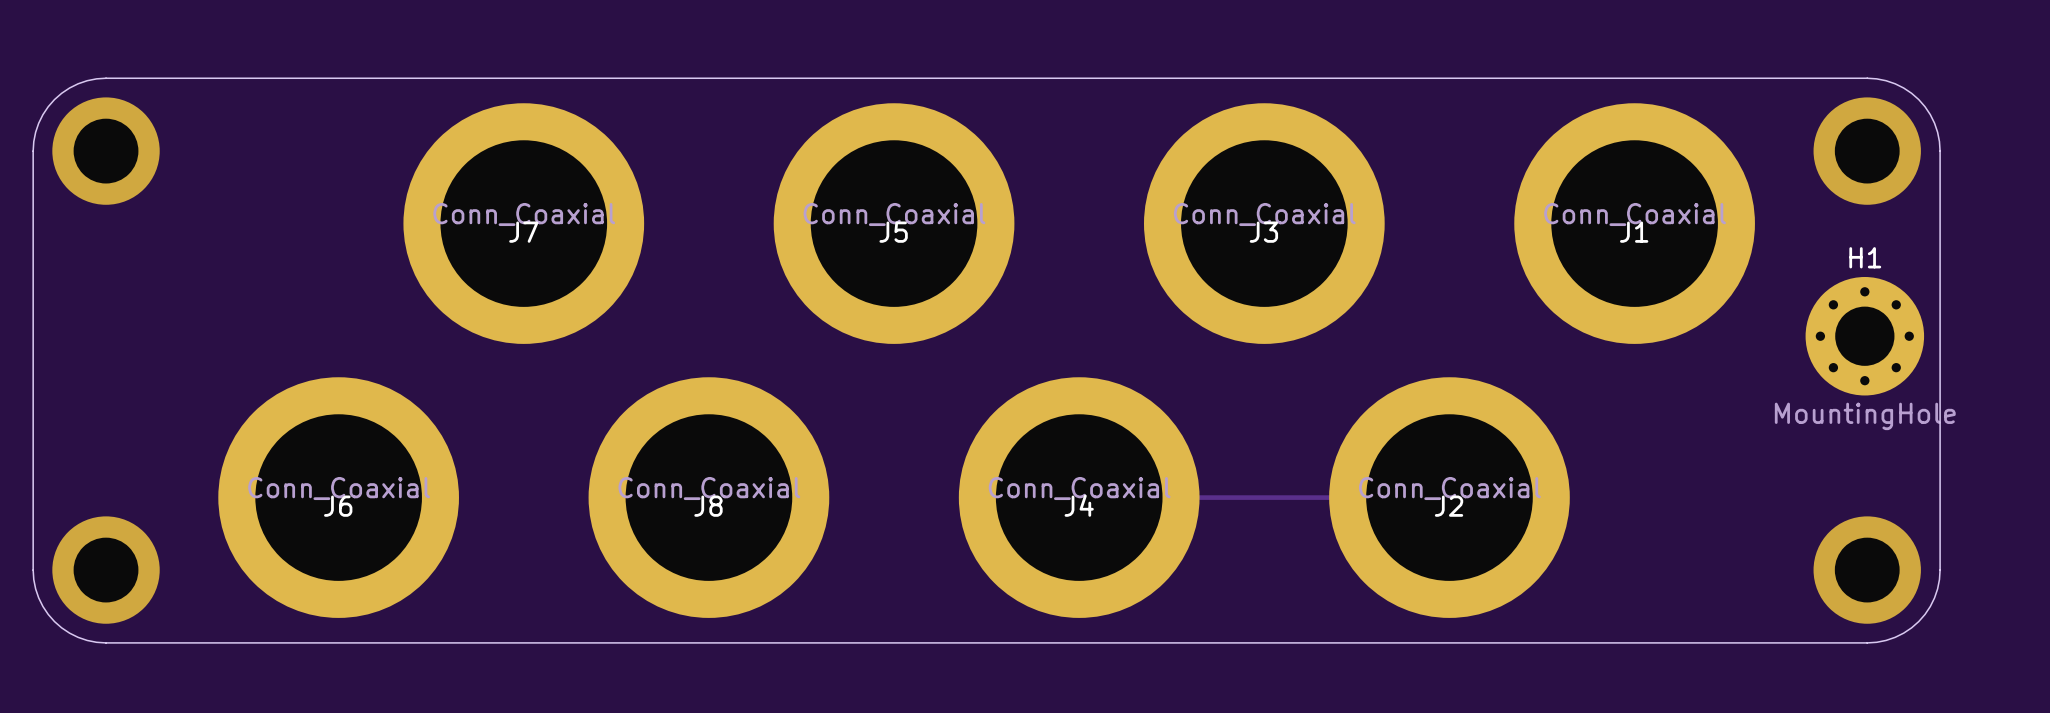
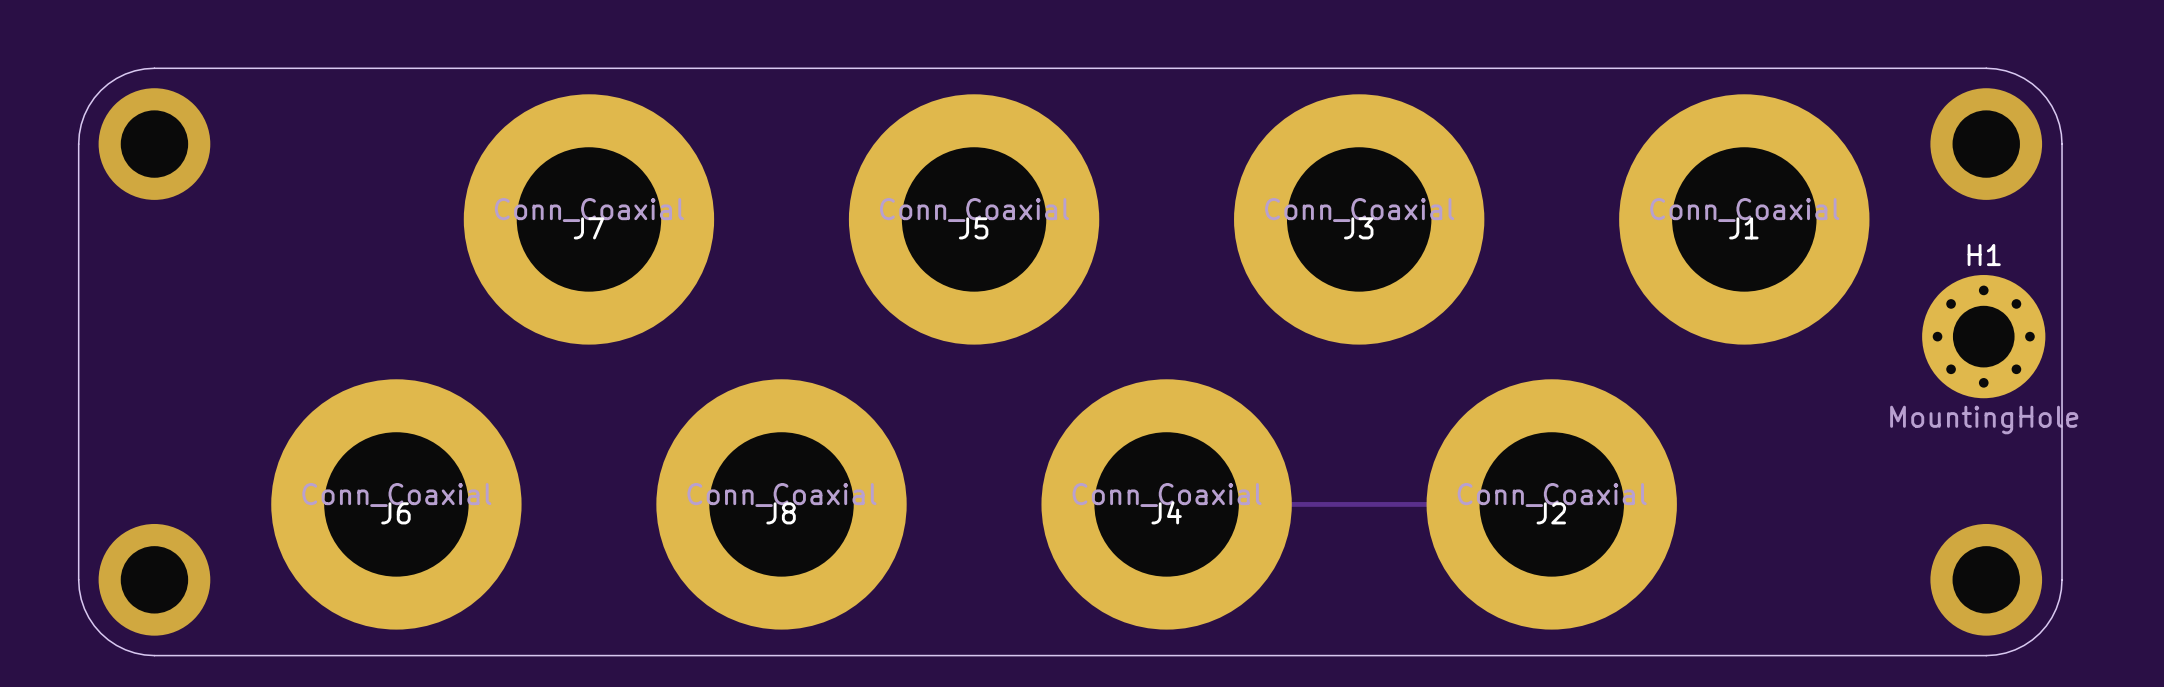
J7 footprint: [403, 103, 645, 344] -> [463, 94, 715, 345]
J5 footprint: [773, 103, 1015, 344] -> [848, 94, 1100, 345]
J3 footprint: [1143, 103, 1385, 344] -> [1234, 94, 1485, 345]
J1 footprint: [1514, 103, 1755, 344] -> [1619, 94, 1870, 345]
J6 footprint: [218, 377, 459, 618] -> [271, 379, 522, 630]
J8 footprint: [588, 377, 830, 618] -> [656, 379, 907, 630]
J4 footprint: [958, 377, 1200, 618] -> [1041, 379, 1292, 630]
J2 footprint: [1329, 377, 1570, 618] -> [1426, 379, 1677, 630]

